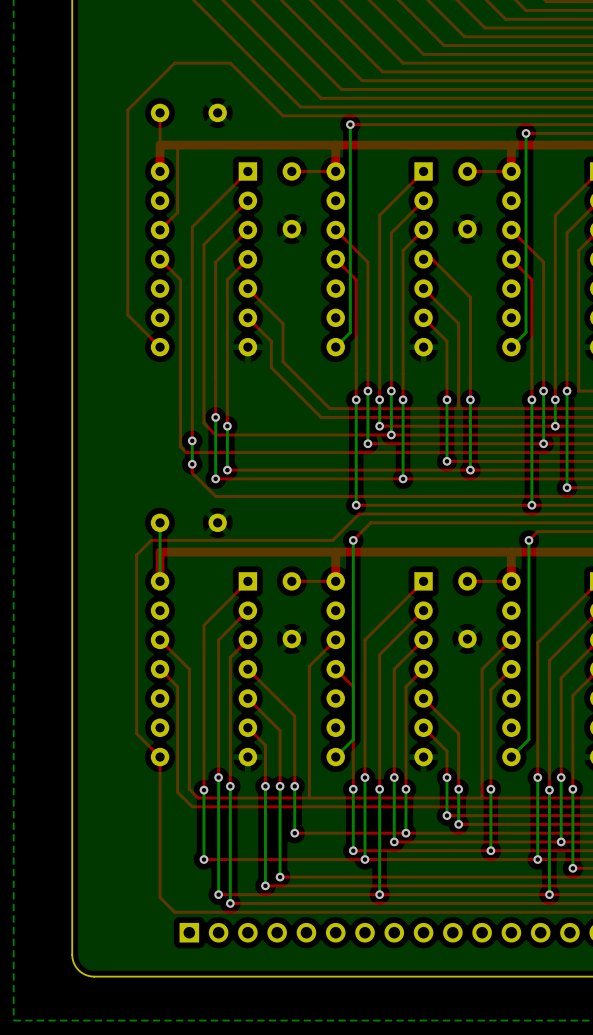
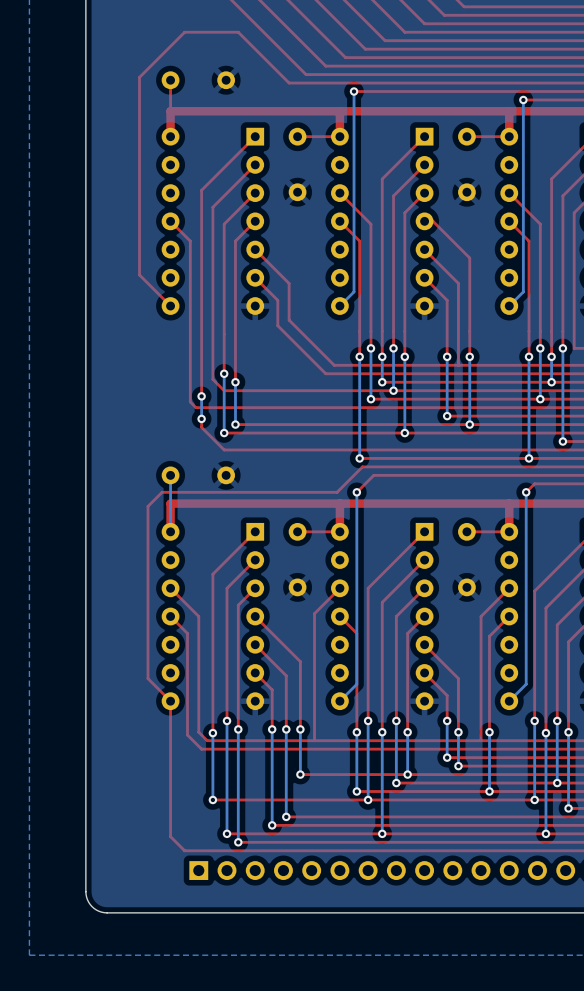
top track: (177, 145) (177, 212) (160, 230) -> none

